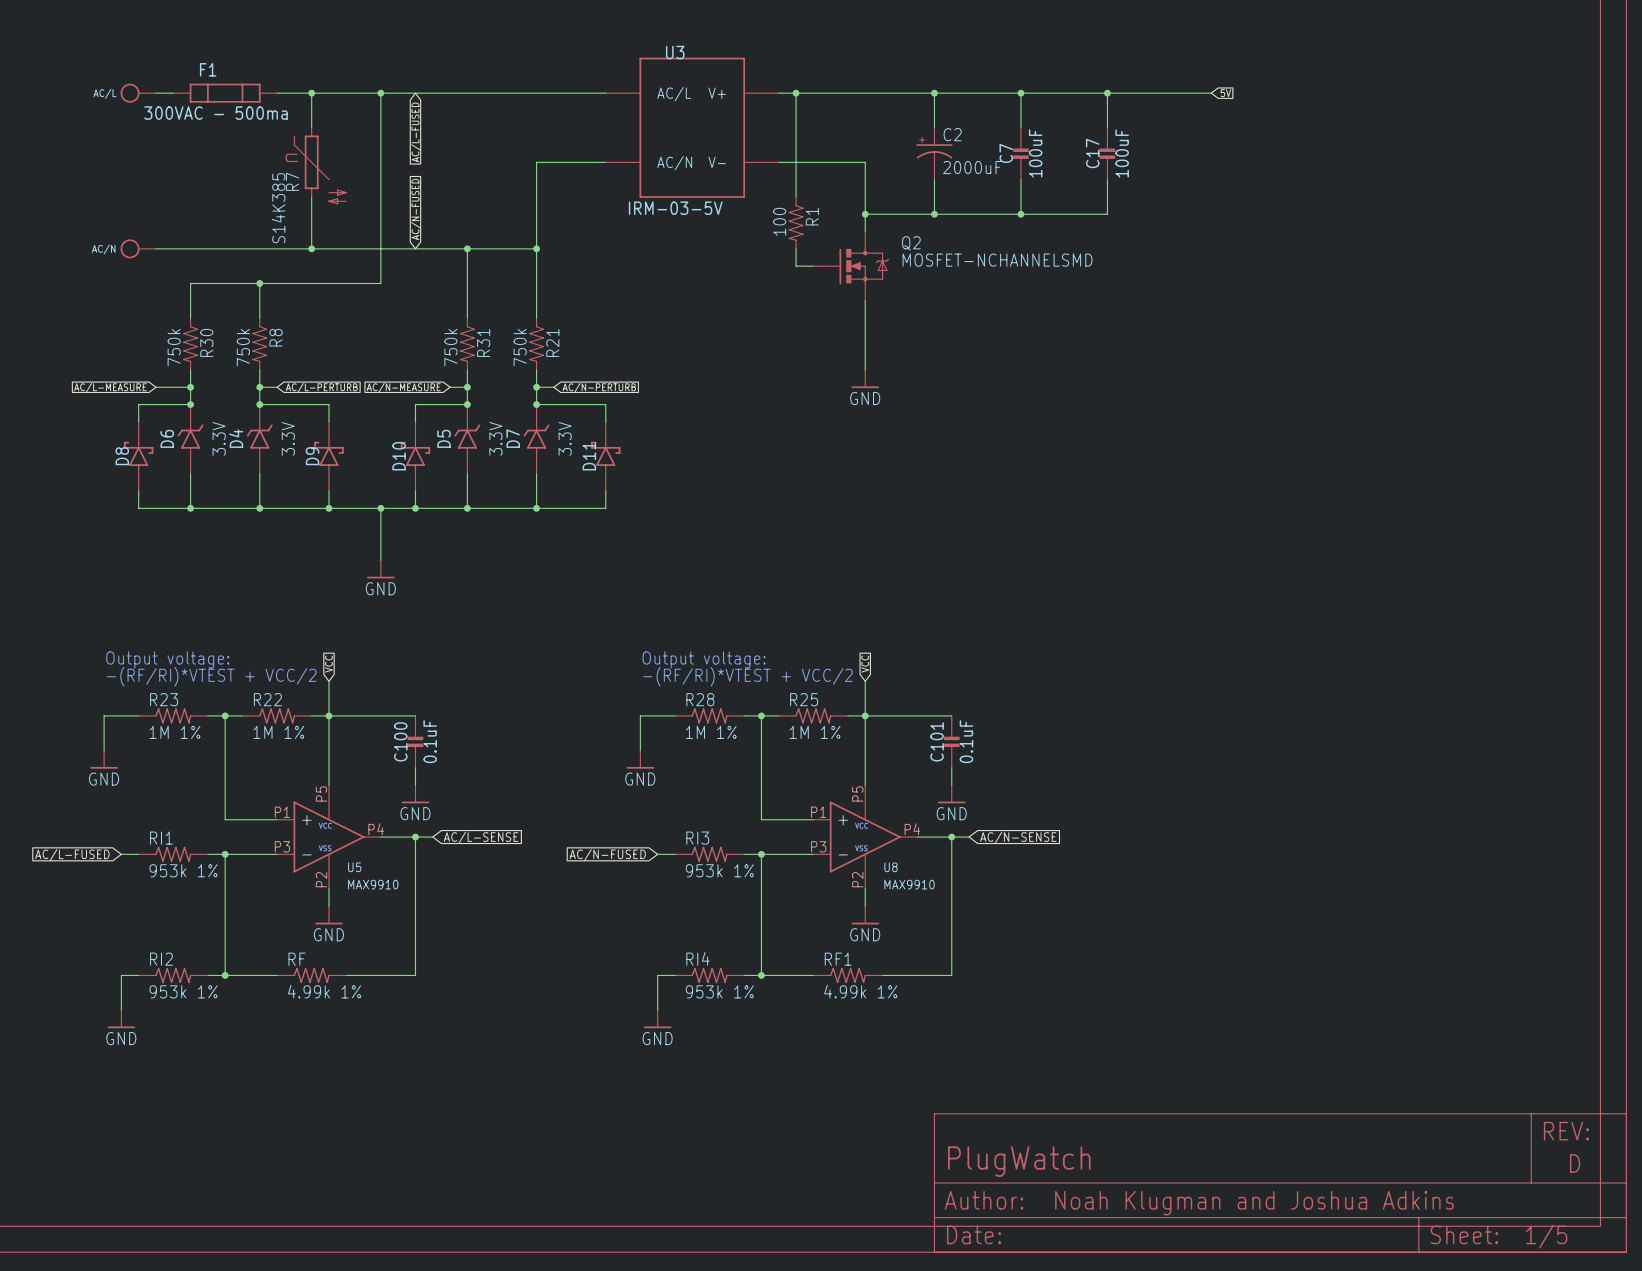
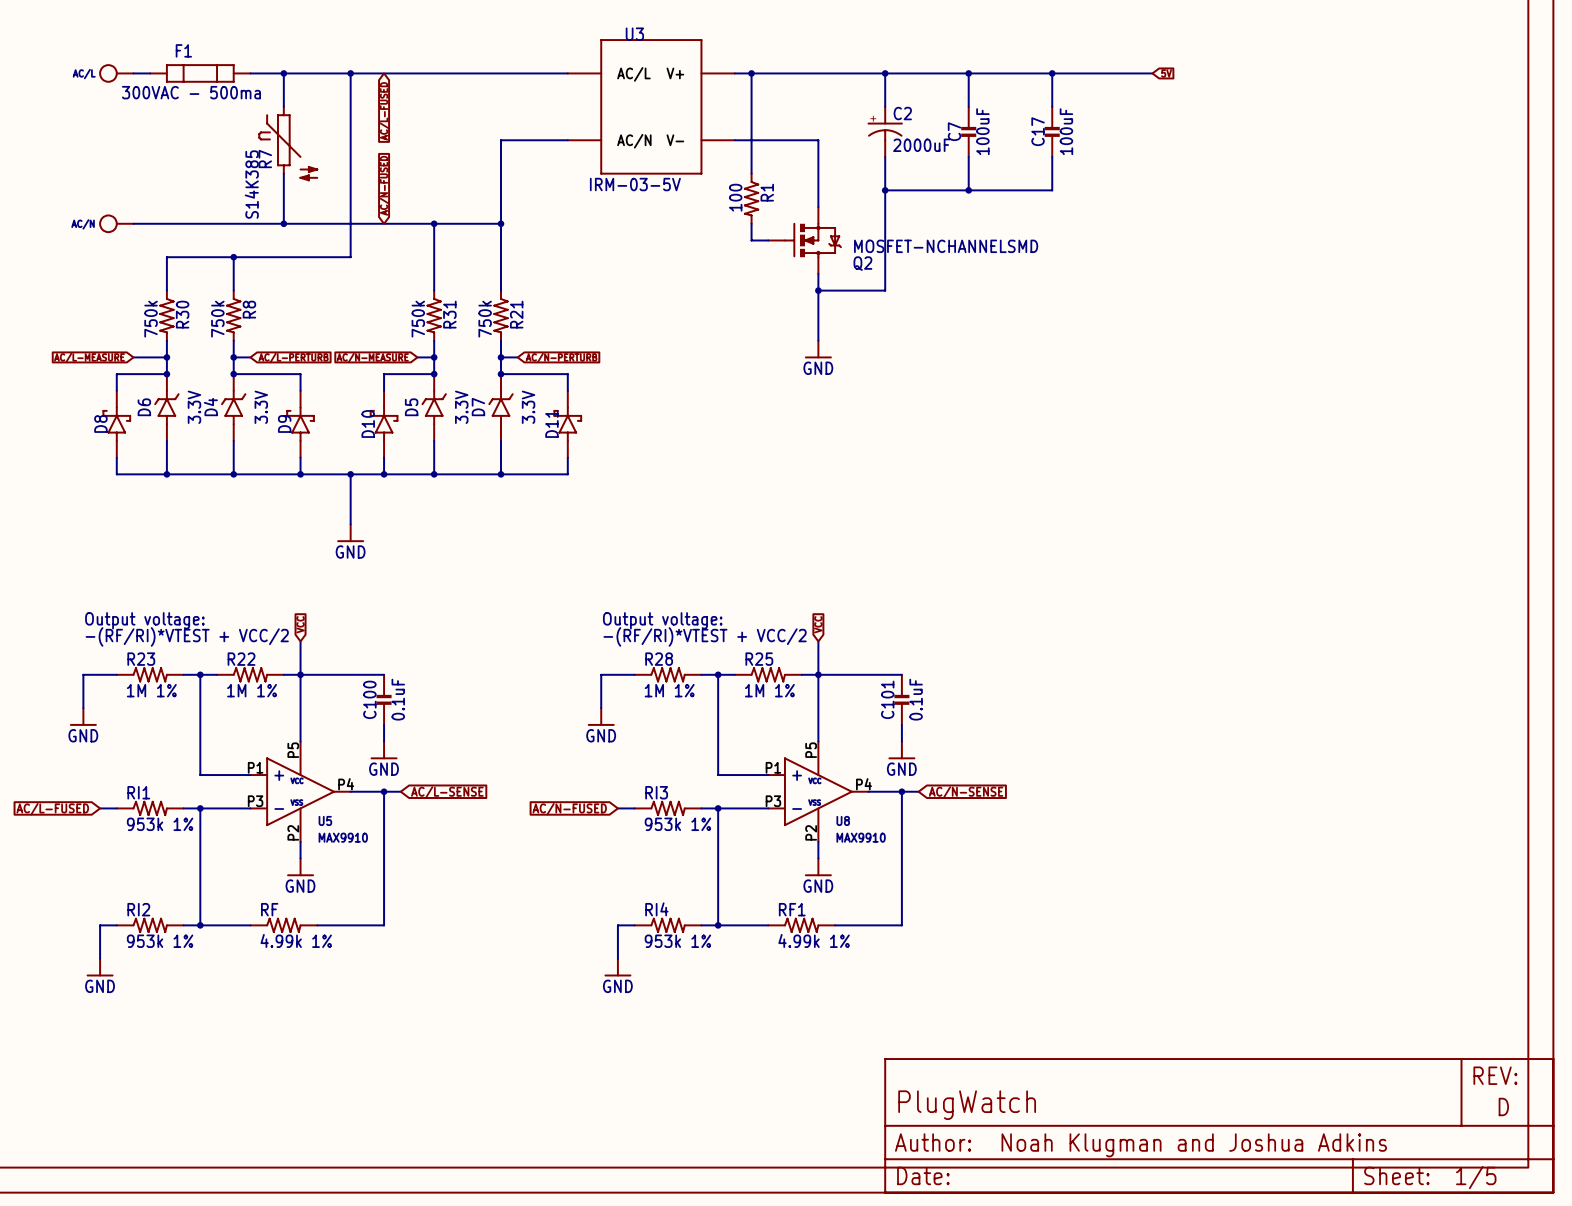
wire: (865, 214) (934, 214) -> (818, 290) (885, 290) (885, 190)
junction: (865, 214) -> none
Q2 flip: as is (859, 266) -> up-down (812, 240)
junction: none -> (818, 290)

